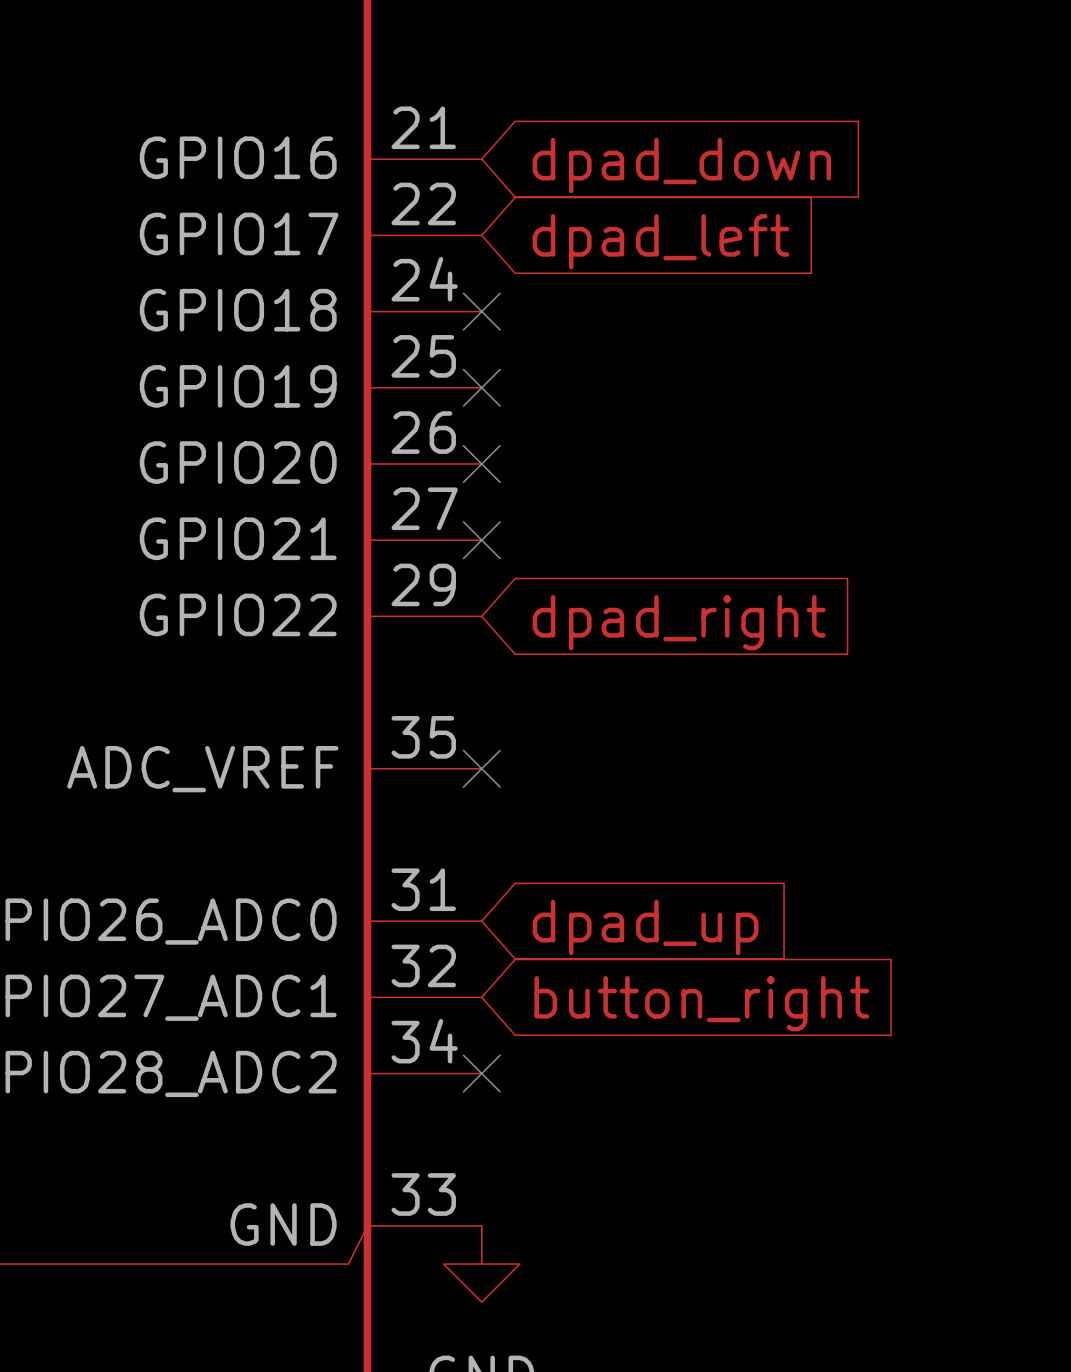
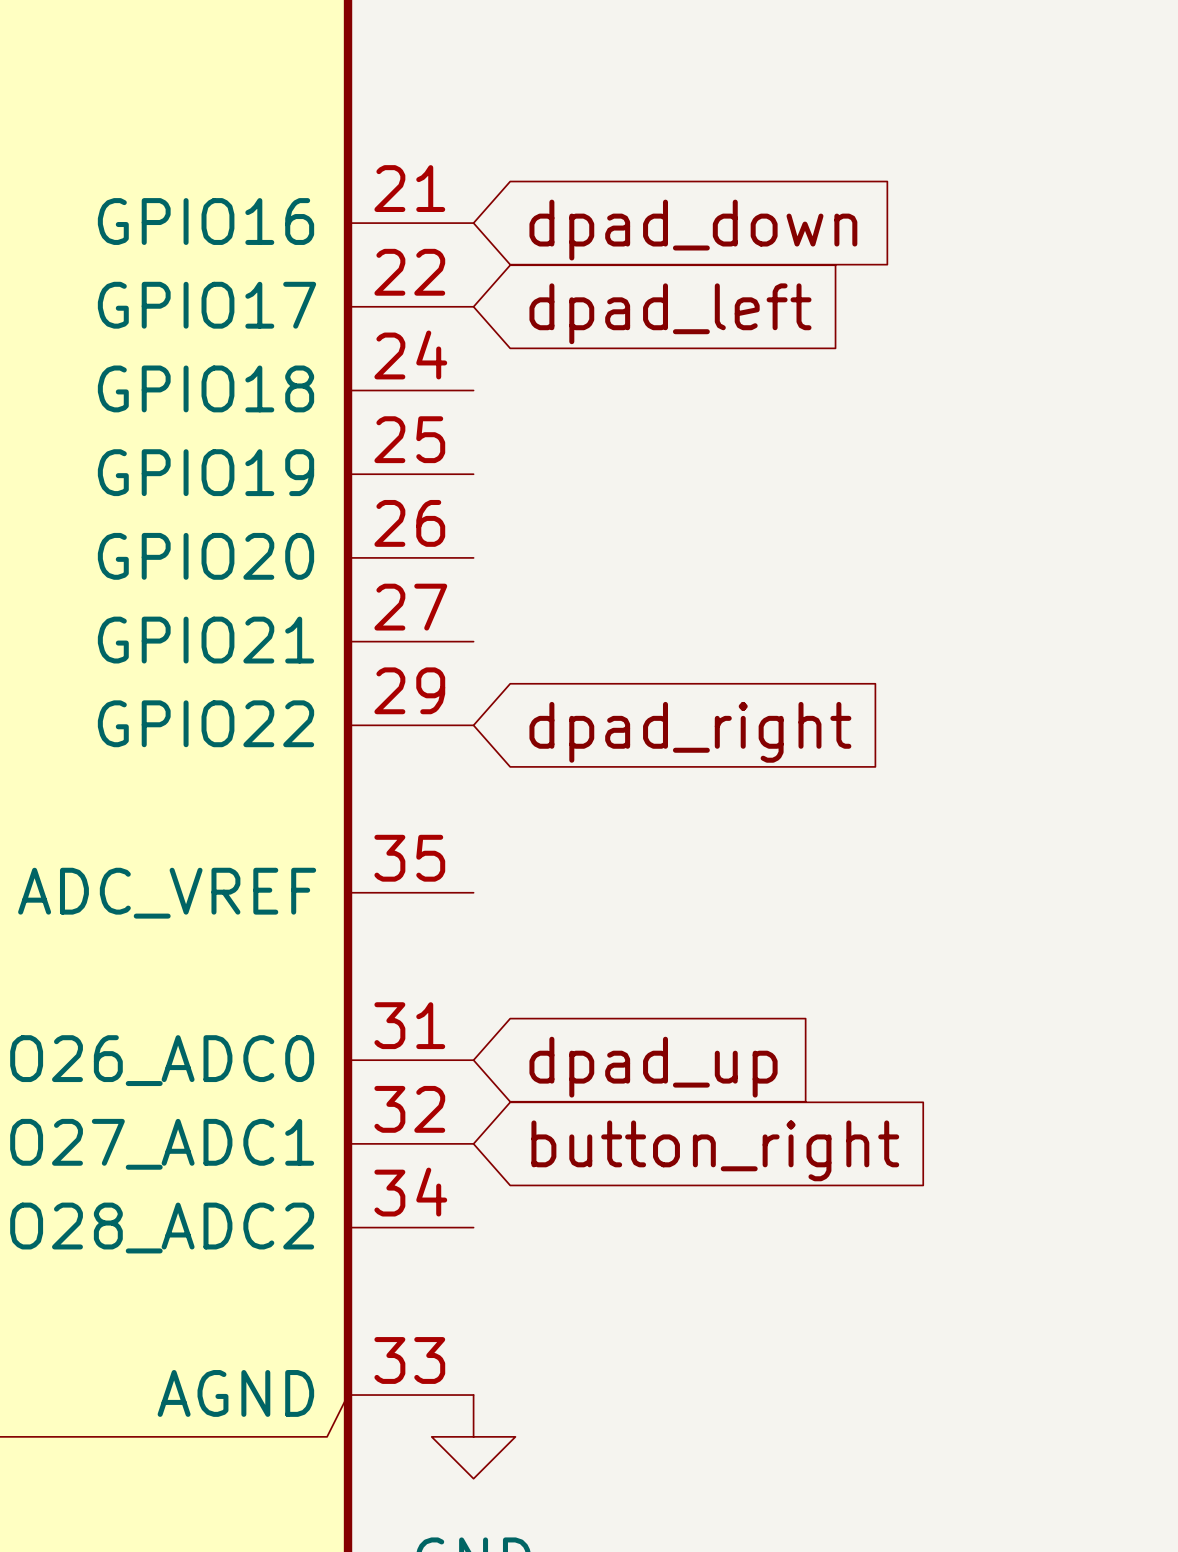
no-connect mark: (481, 311) -> none
no-connect mark: (481, 387) -> none
no-connect mark: (481, 463) -> none
no-connect mark: (481, 540) -> none
no-connect mark: (481, 768) -> none
no-connect mark: (481, 1073) -> none
part pin name: GND (283, 1224) -> AGND (235, 1393)

